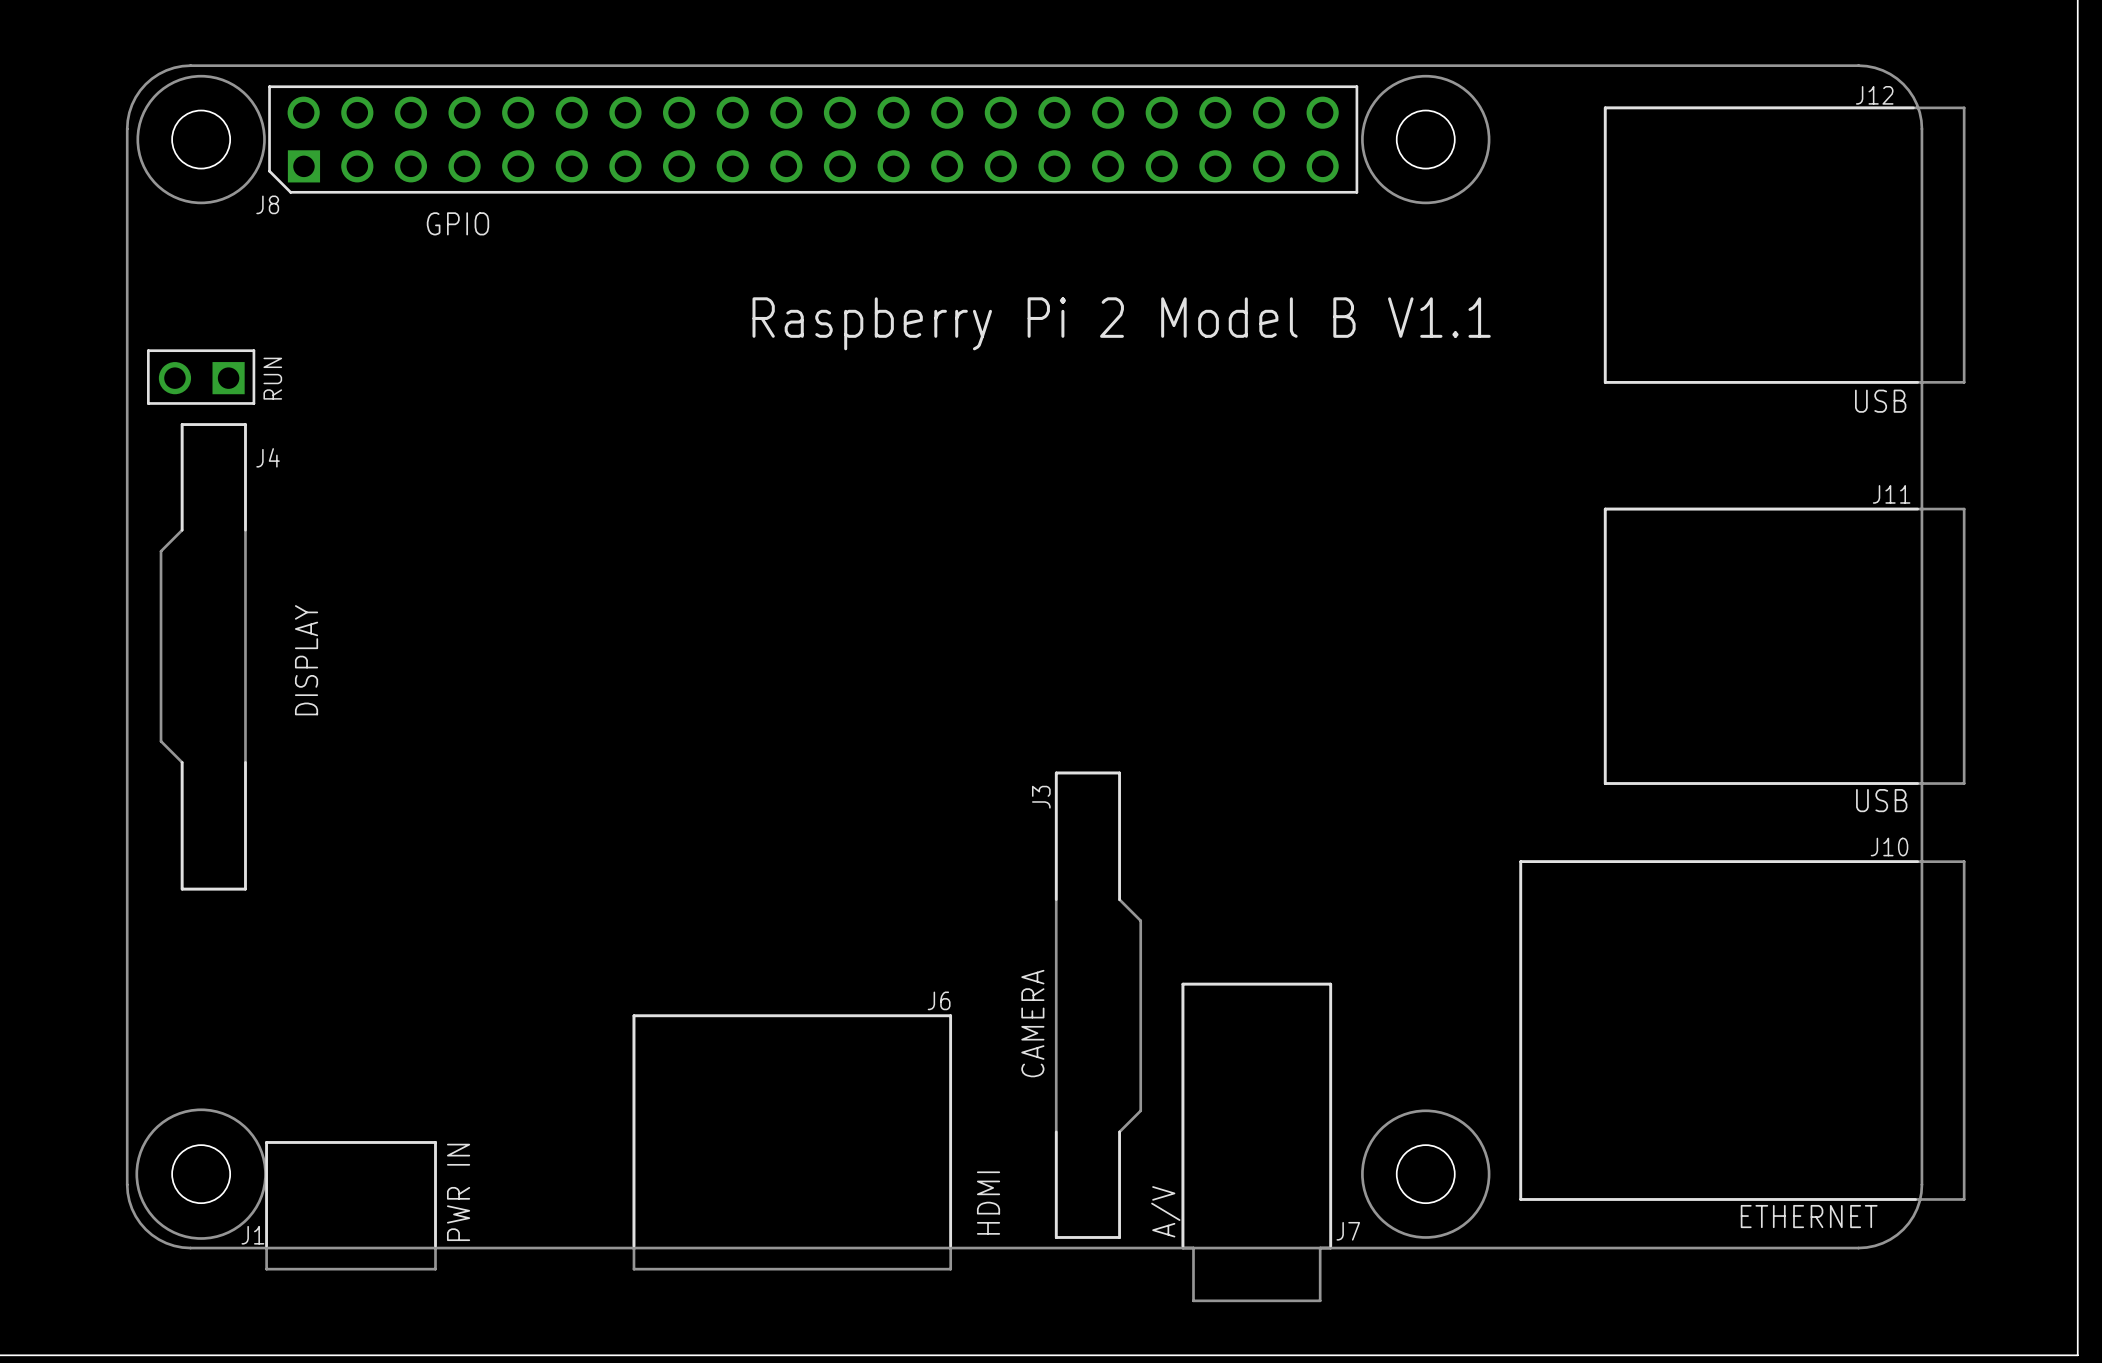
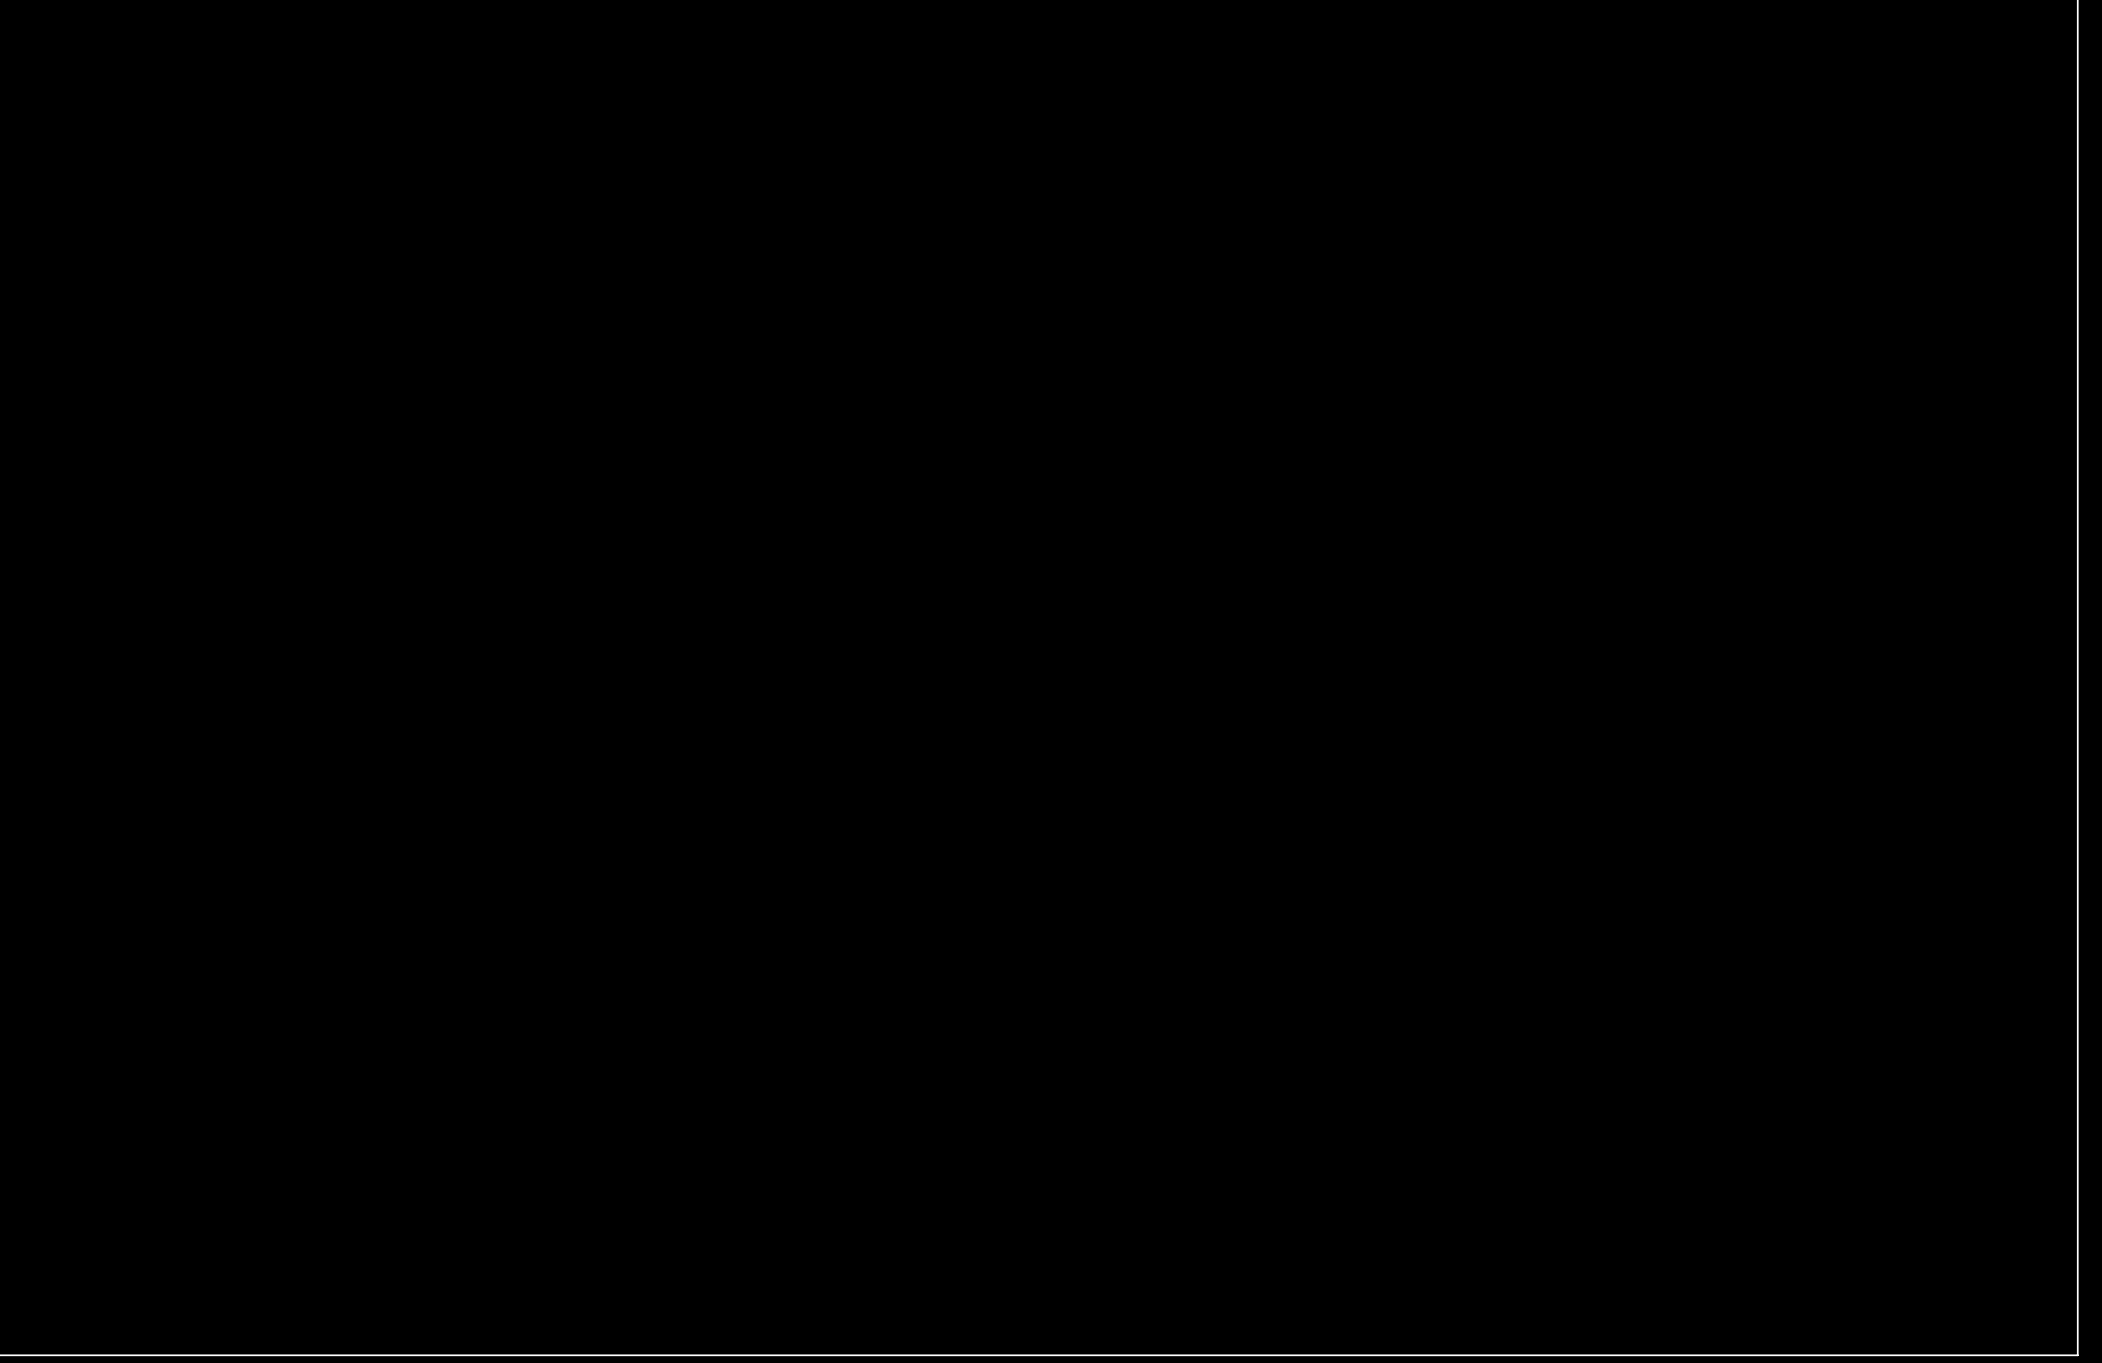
part: (1045, 683) -> none

